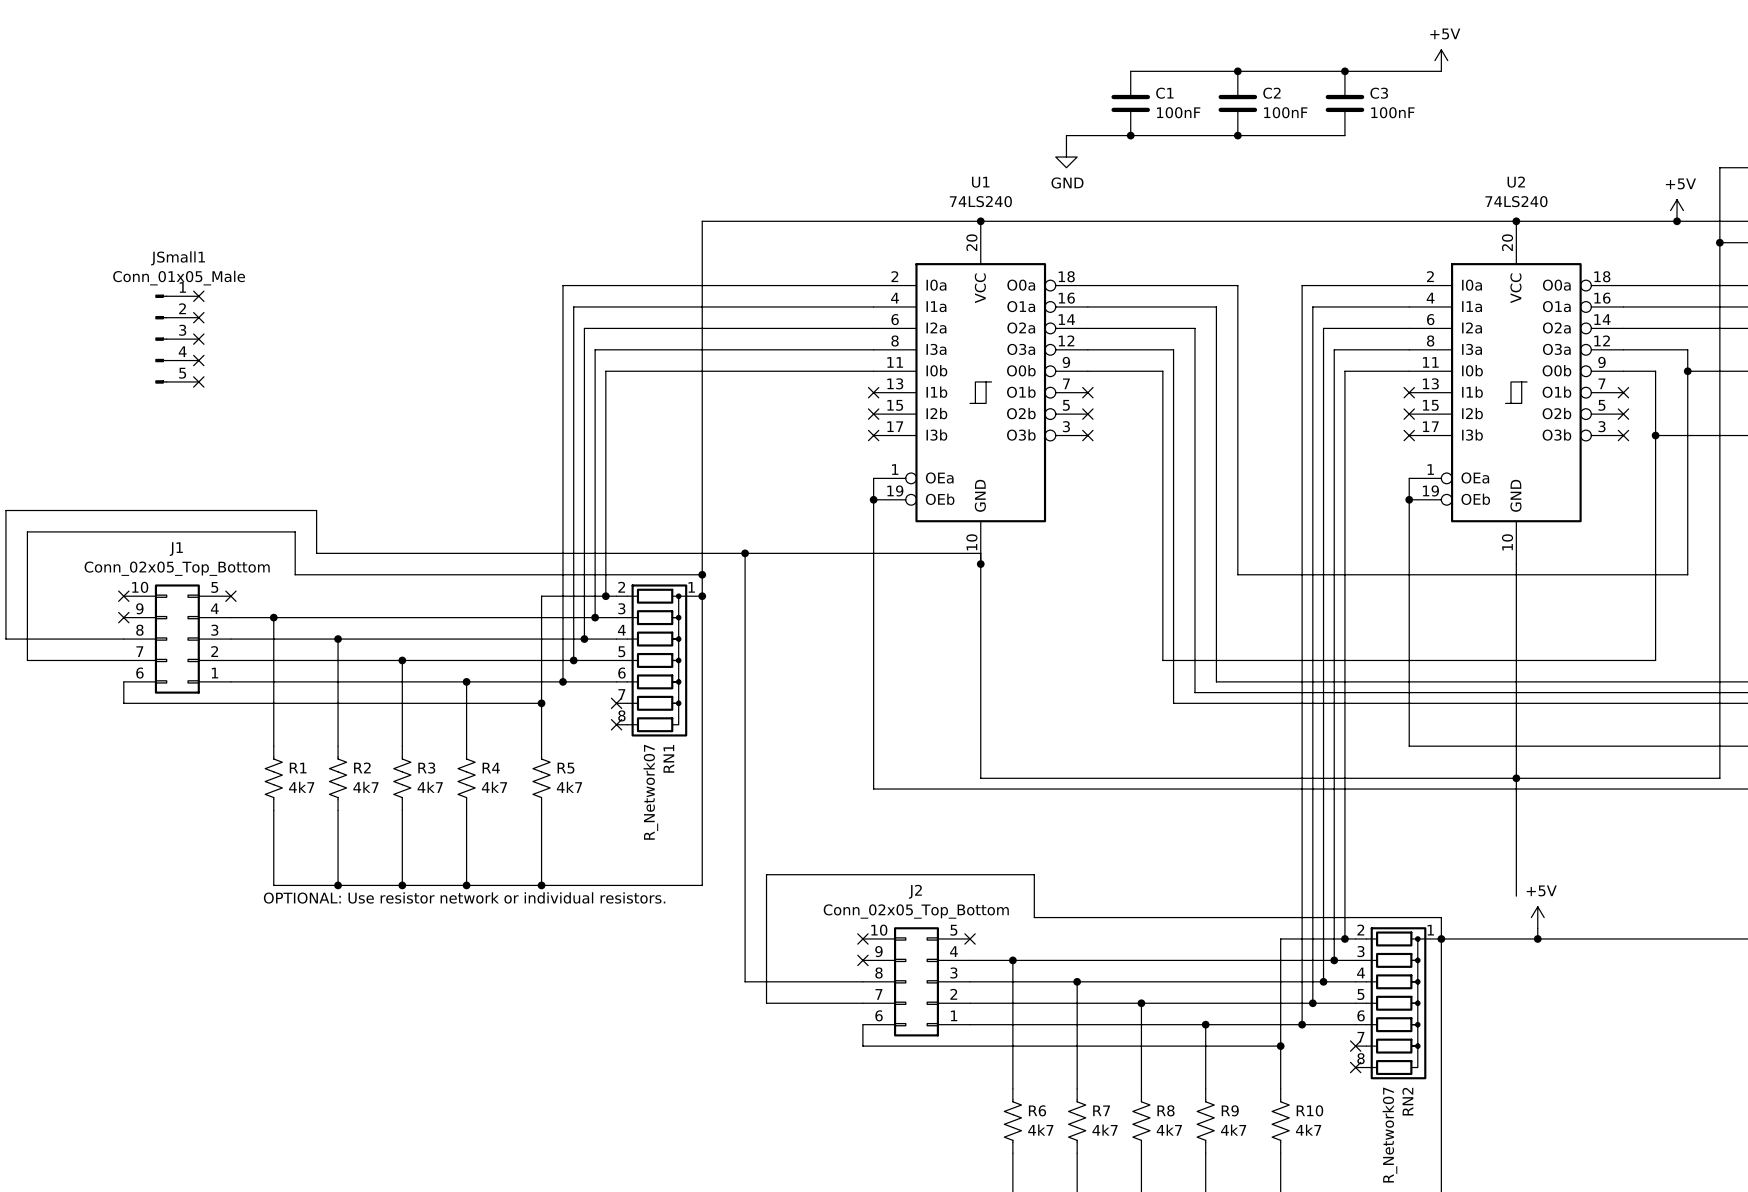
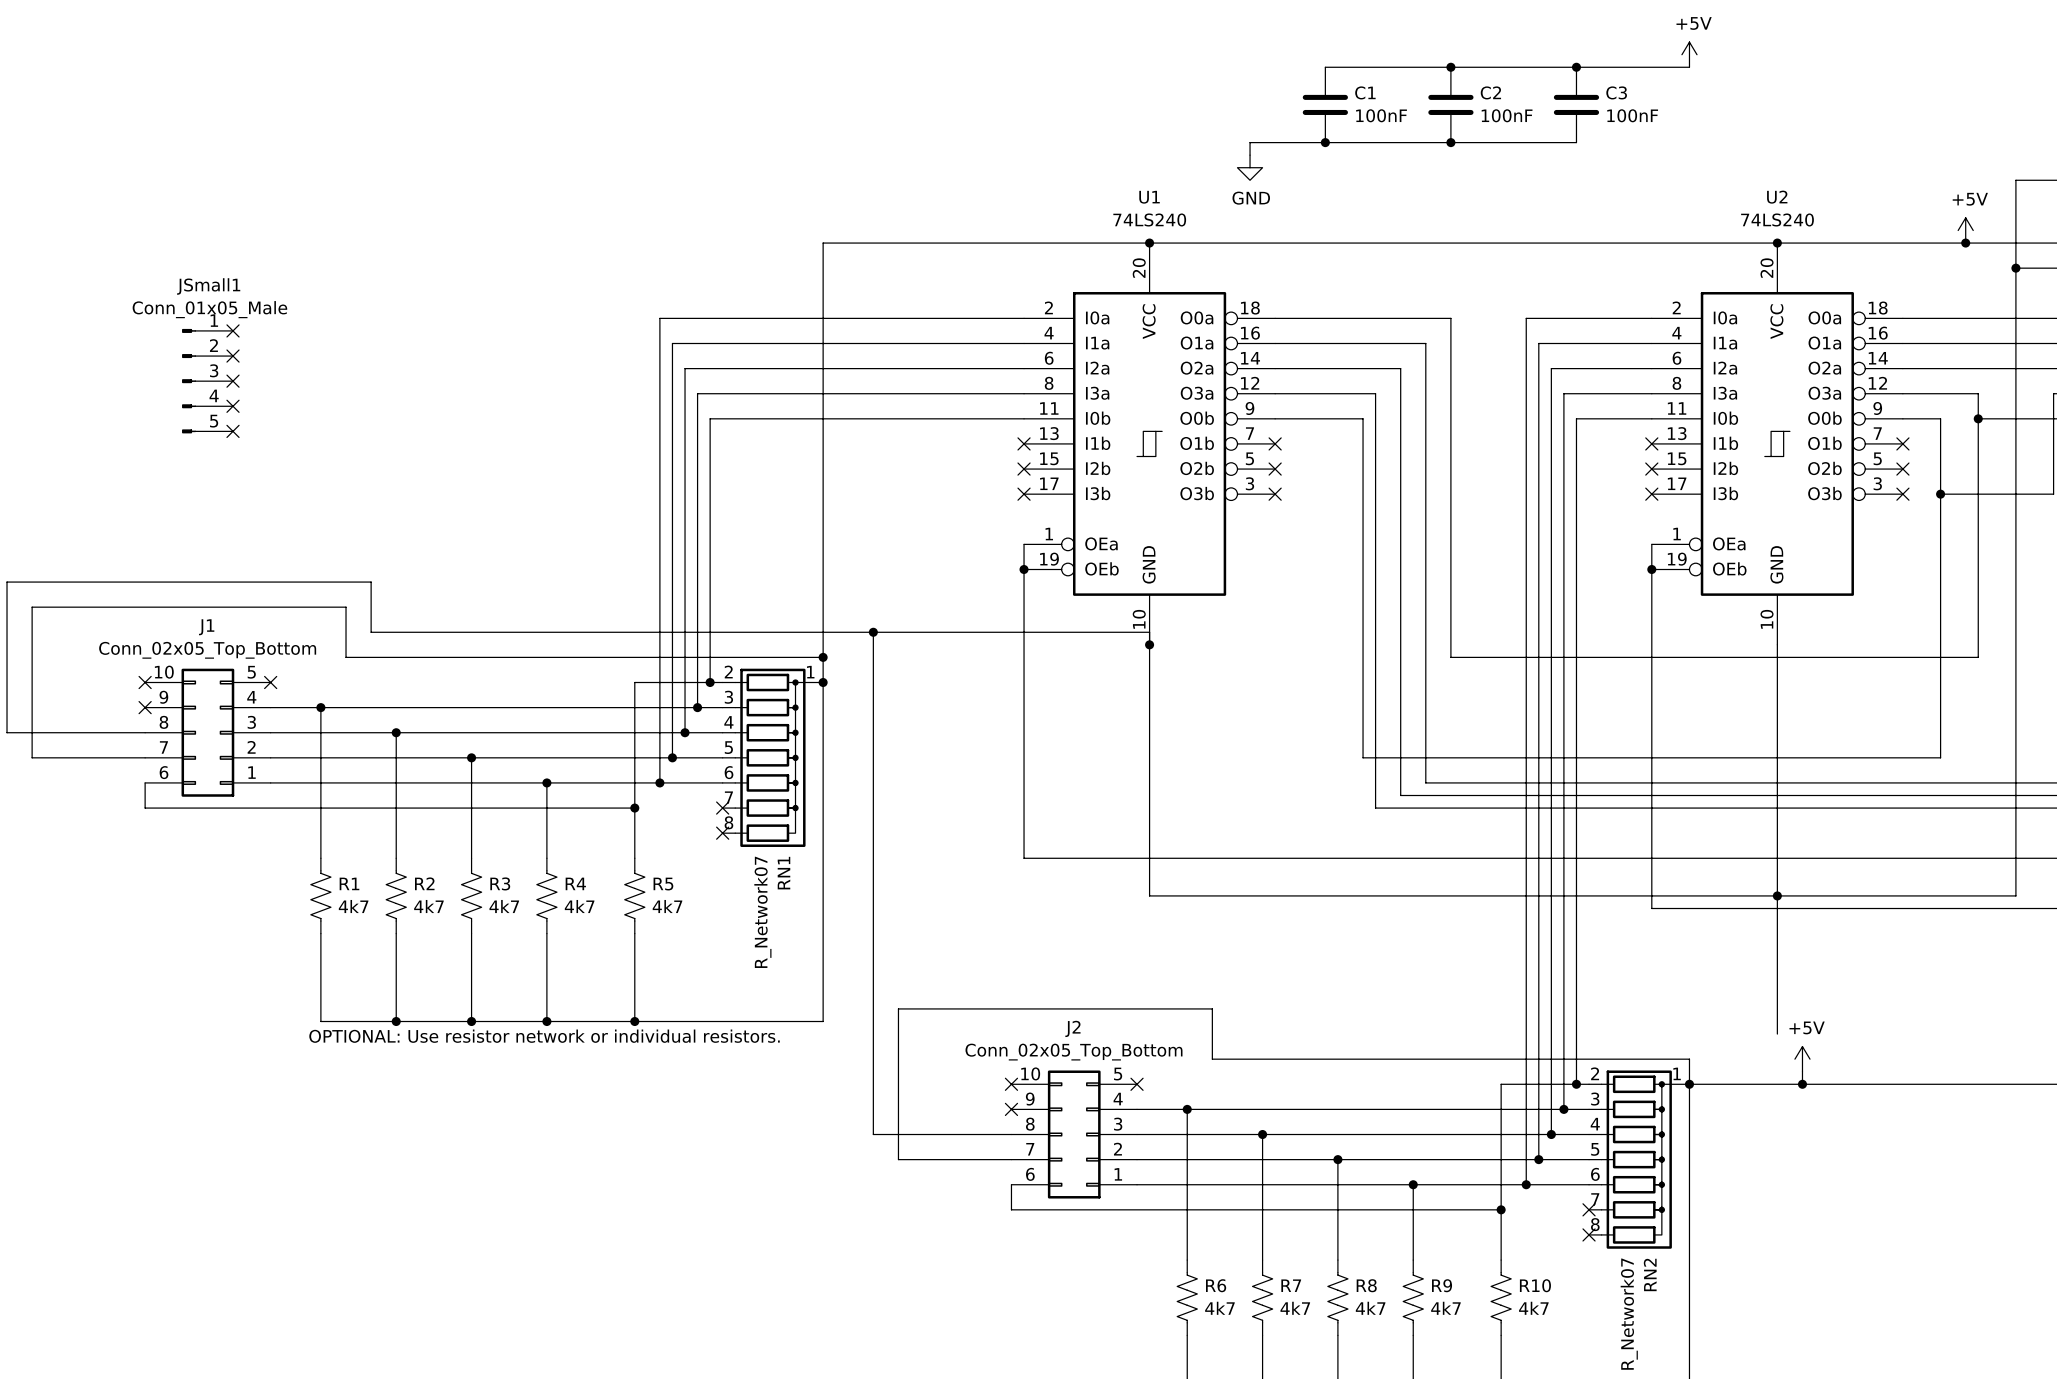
wire: (873, 746) (873, 789) (1409, 789) -> (1024, 858) (1651, 858) (1651, 908)

